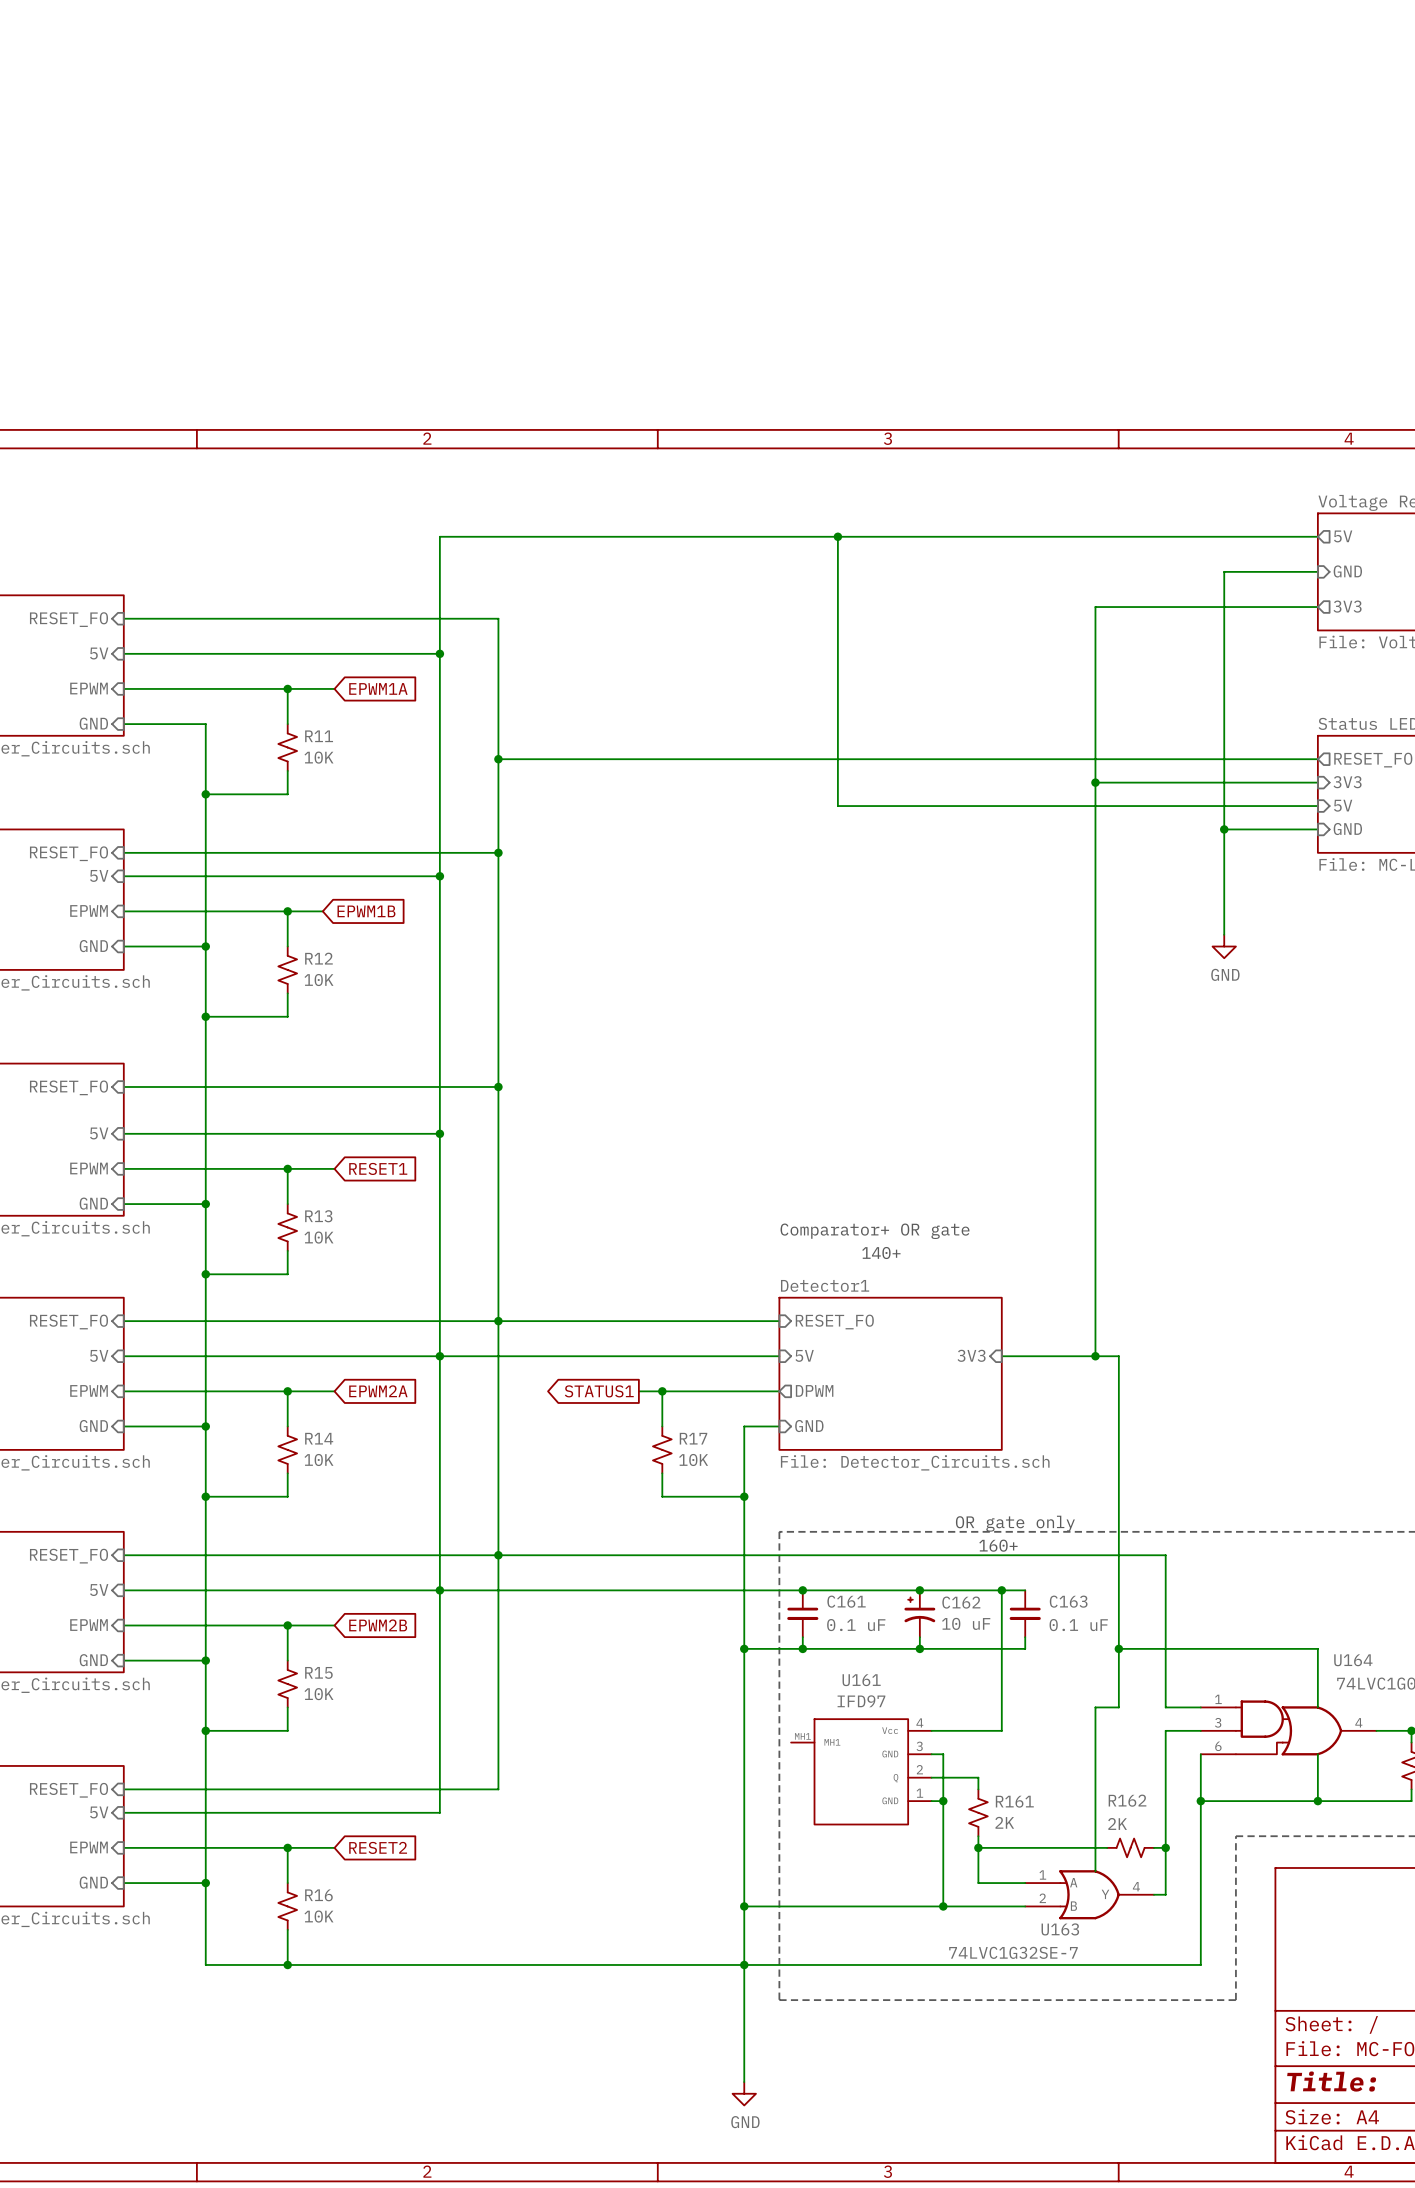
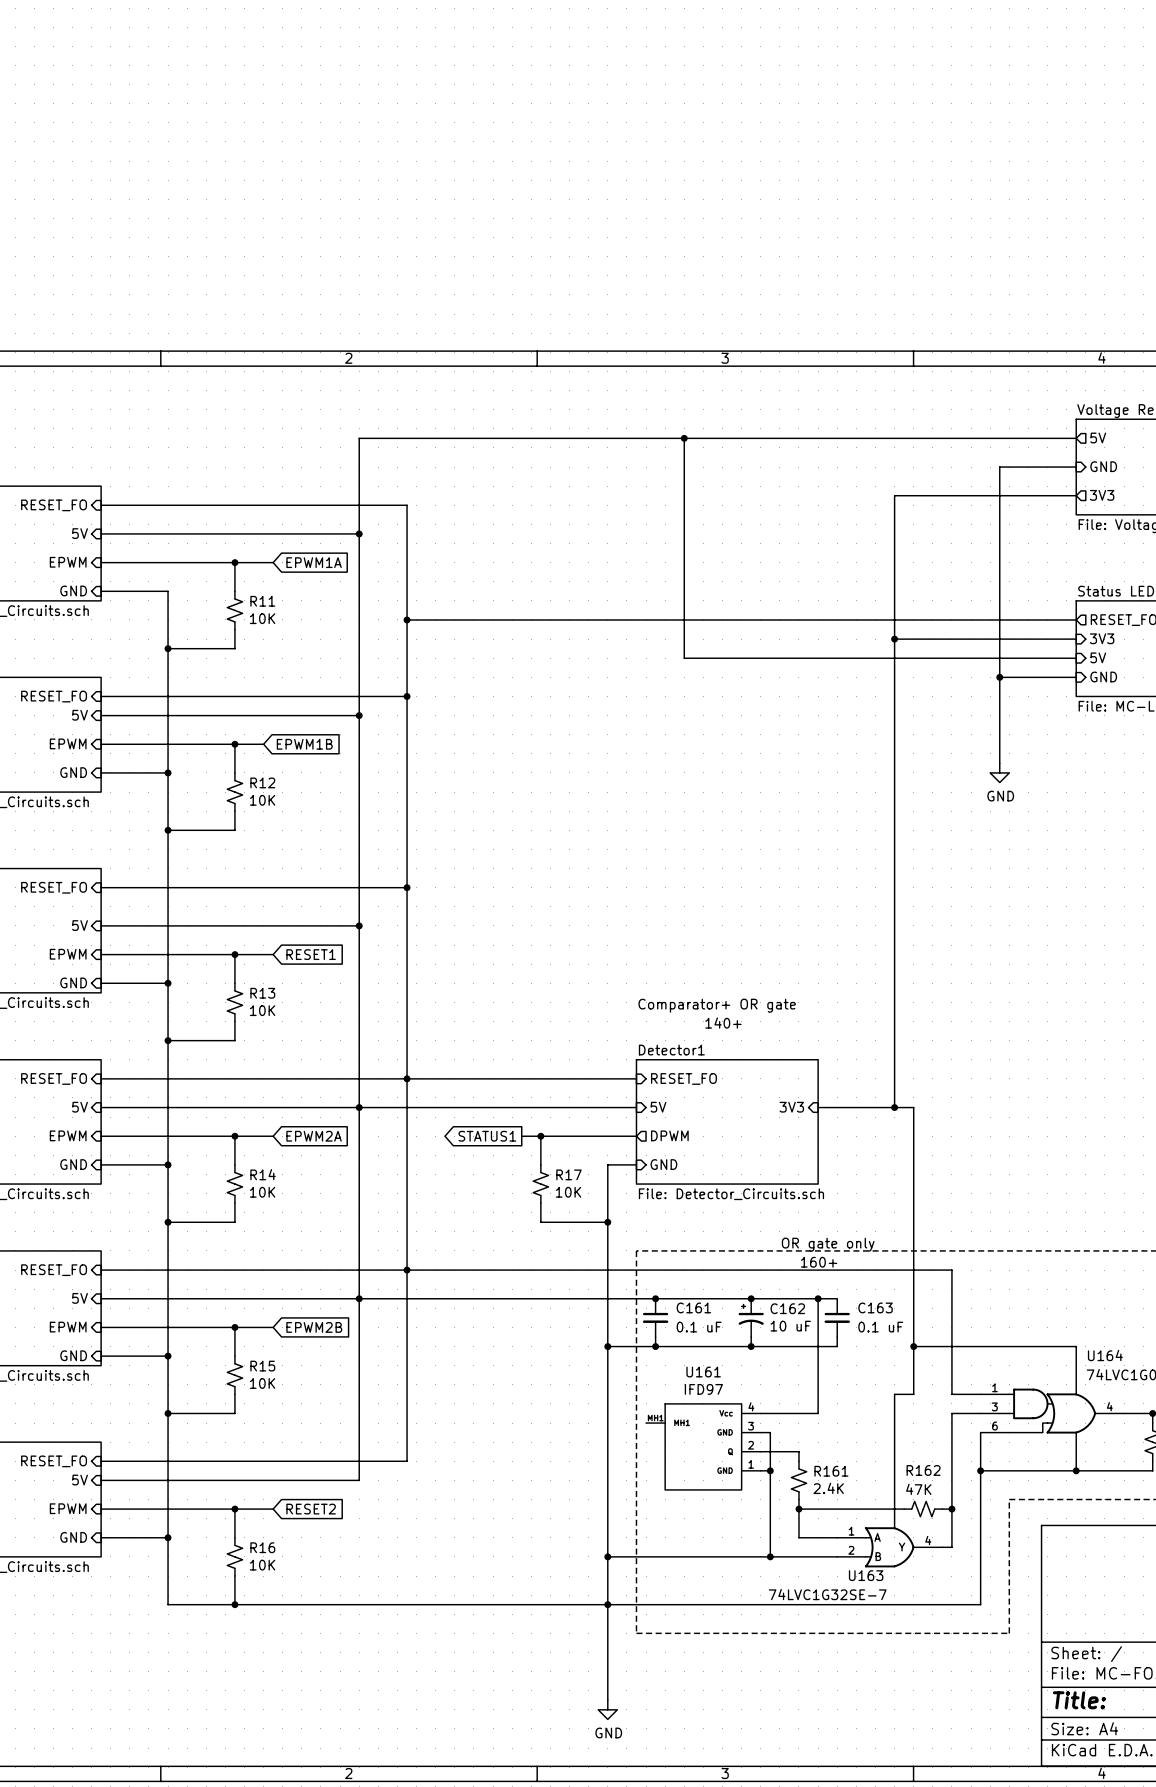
R161 value: 2K (1004, 1822) -> 2.4K (828, 1488)
R162 value: 2K (1117, 1823) -> 47K (918, 1489)

